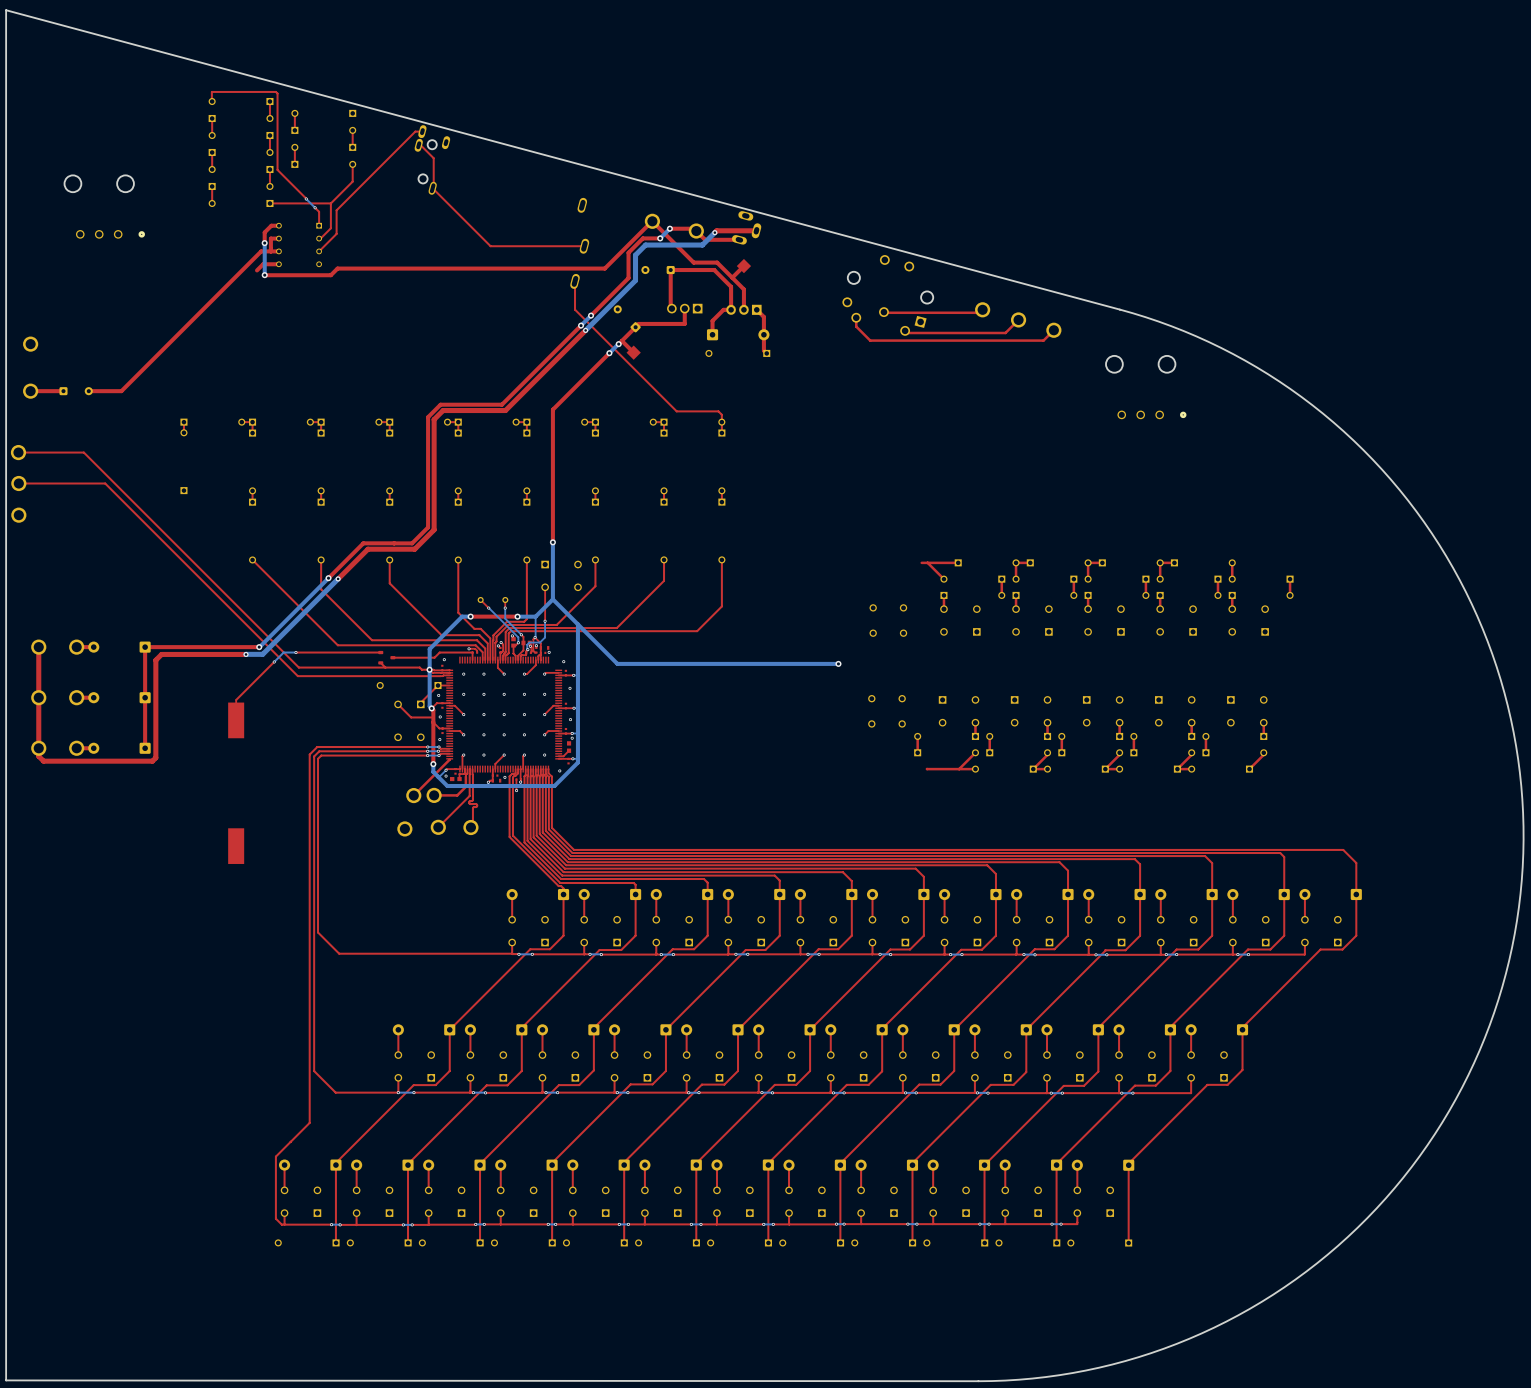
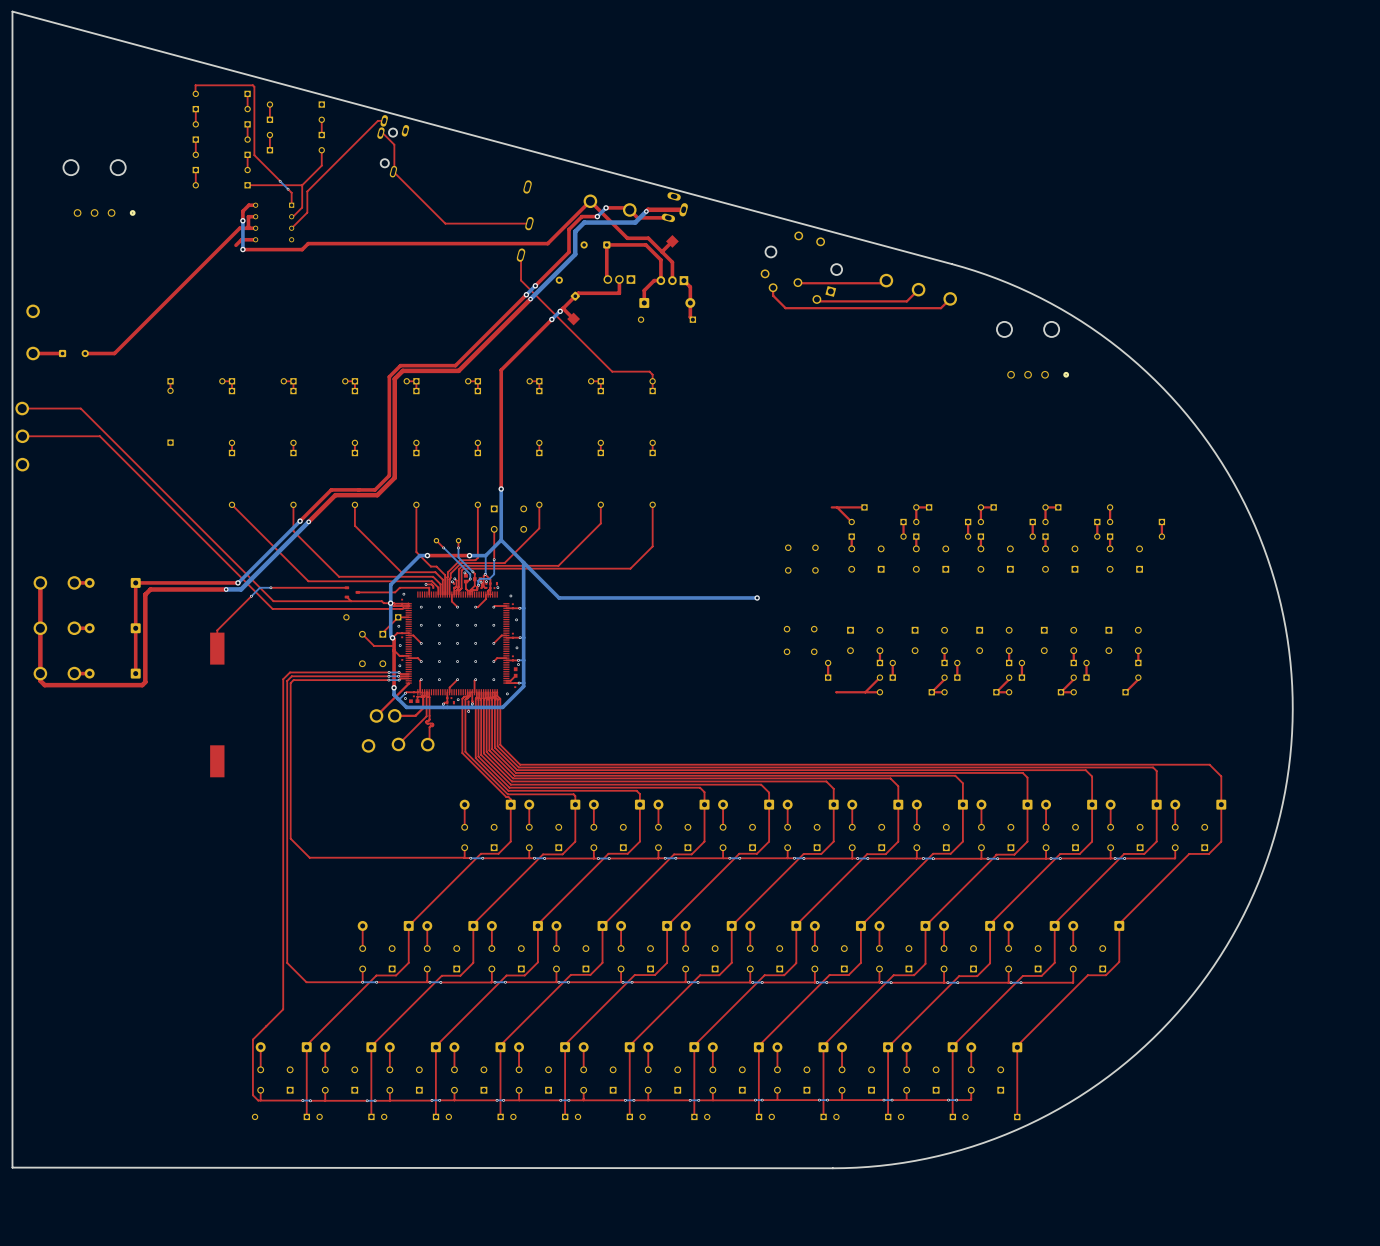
board edge: (6, 10) (1119, 309) (1145, 317) (1196, 336) (1244, 360) (1290, 389) (1333, 422) (1372, 459) (1408, 500) (1431, 533) (1459, 579) (1482, 628) (1500, 679) (1513, 732) (1521, 785) (1523, 839) (1520, 893) (1512, 947) (1498, 999) (1479, 1050) (1455, 1099) (1427, 1145) (1394, 1188) (1357, 1227) (1327, 1254) (1284, 1287) (1249, 1308) (1201, 1333) (1151, 1353) (1099, 1367) (1059, 1375) (1018, 1379) (978, 1381) (6, 1380) (6, 10) -> (832, 1168) (891, 1164) (961, 1150) (1016, 1129) (1069, 1102) (1117, 1069) (1161, 1029) (1200, 984) (1238, 925) (1262, 871) (1280, 815) (1291, 745) (1292, 685) (1285, 627) (1267, 558) (1239, 493) (1208, 443) (1163, 388) (1110, 341) (1050, 303) (986, 274) (12, 11) (12, 1167) (832, 1168)

